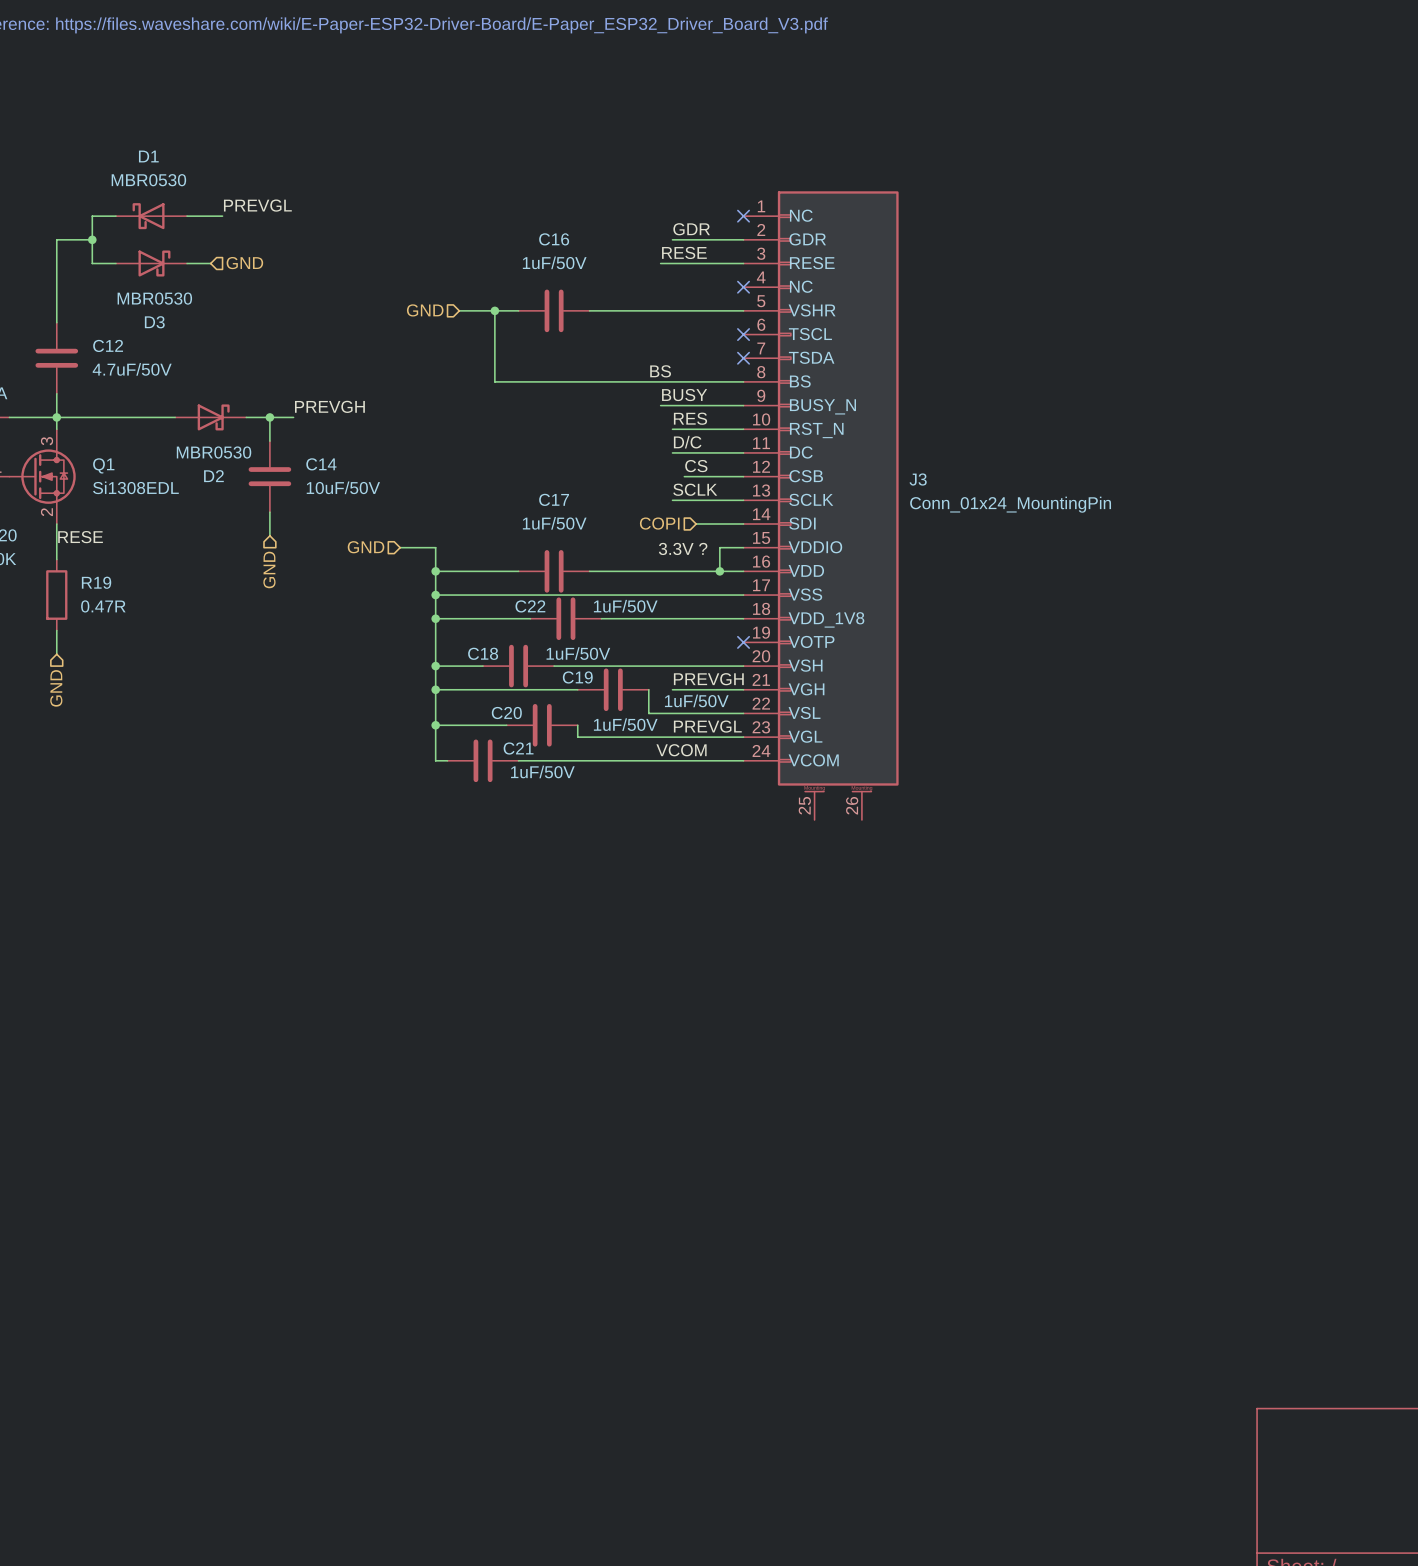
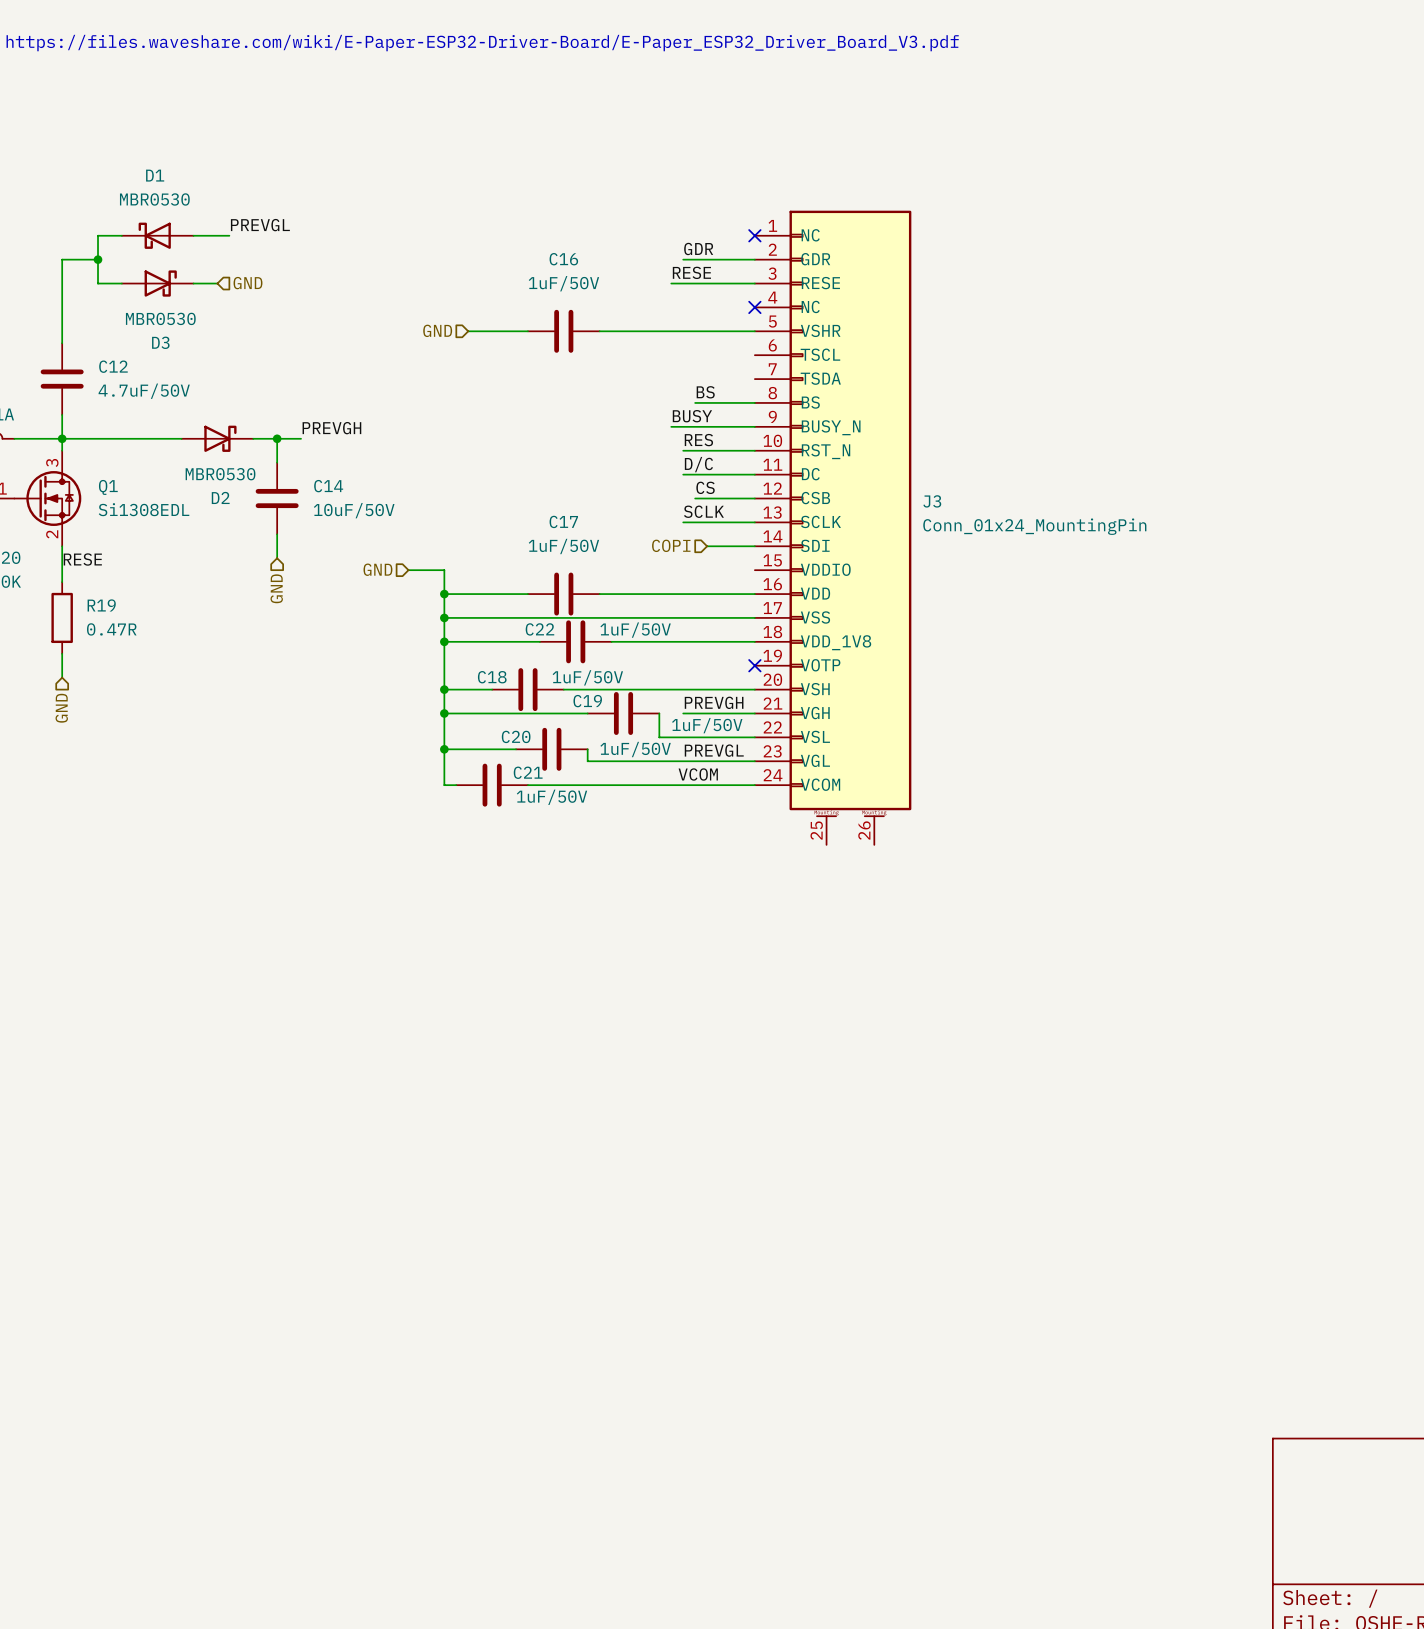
wire: (494, 310) (494, 381) (684, 381) -> none
junction: (494, 310) -> none
no-connect mark: (743, 334) -> none
no-connect mark: (743, 358) -> none
label position: BS (660, 371) -> BS (705, 392)
wire: (743, 547) (719, 547) (719, 571) -> none
label: 3.3V ? (683, 548) -> none
junction: (719, 571) -> none

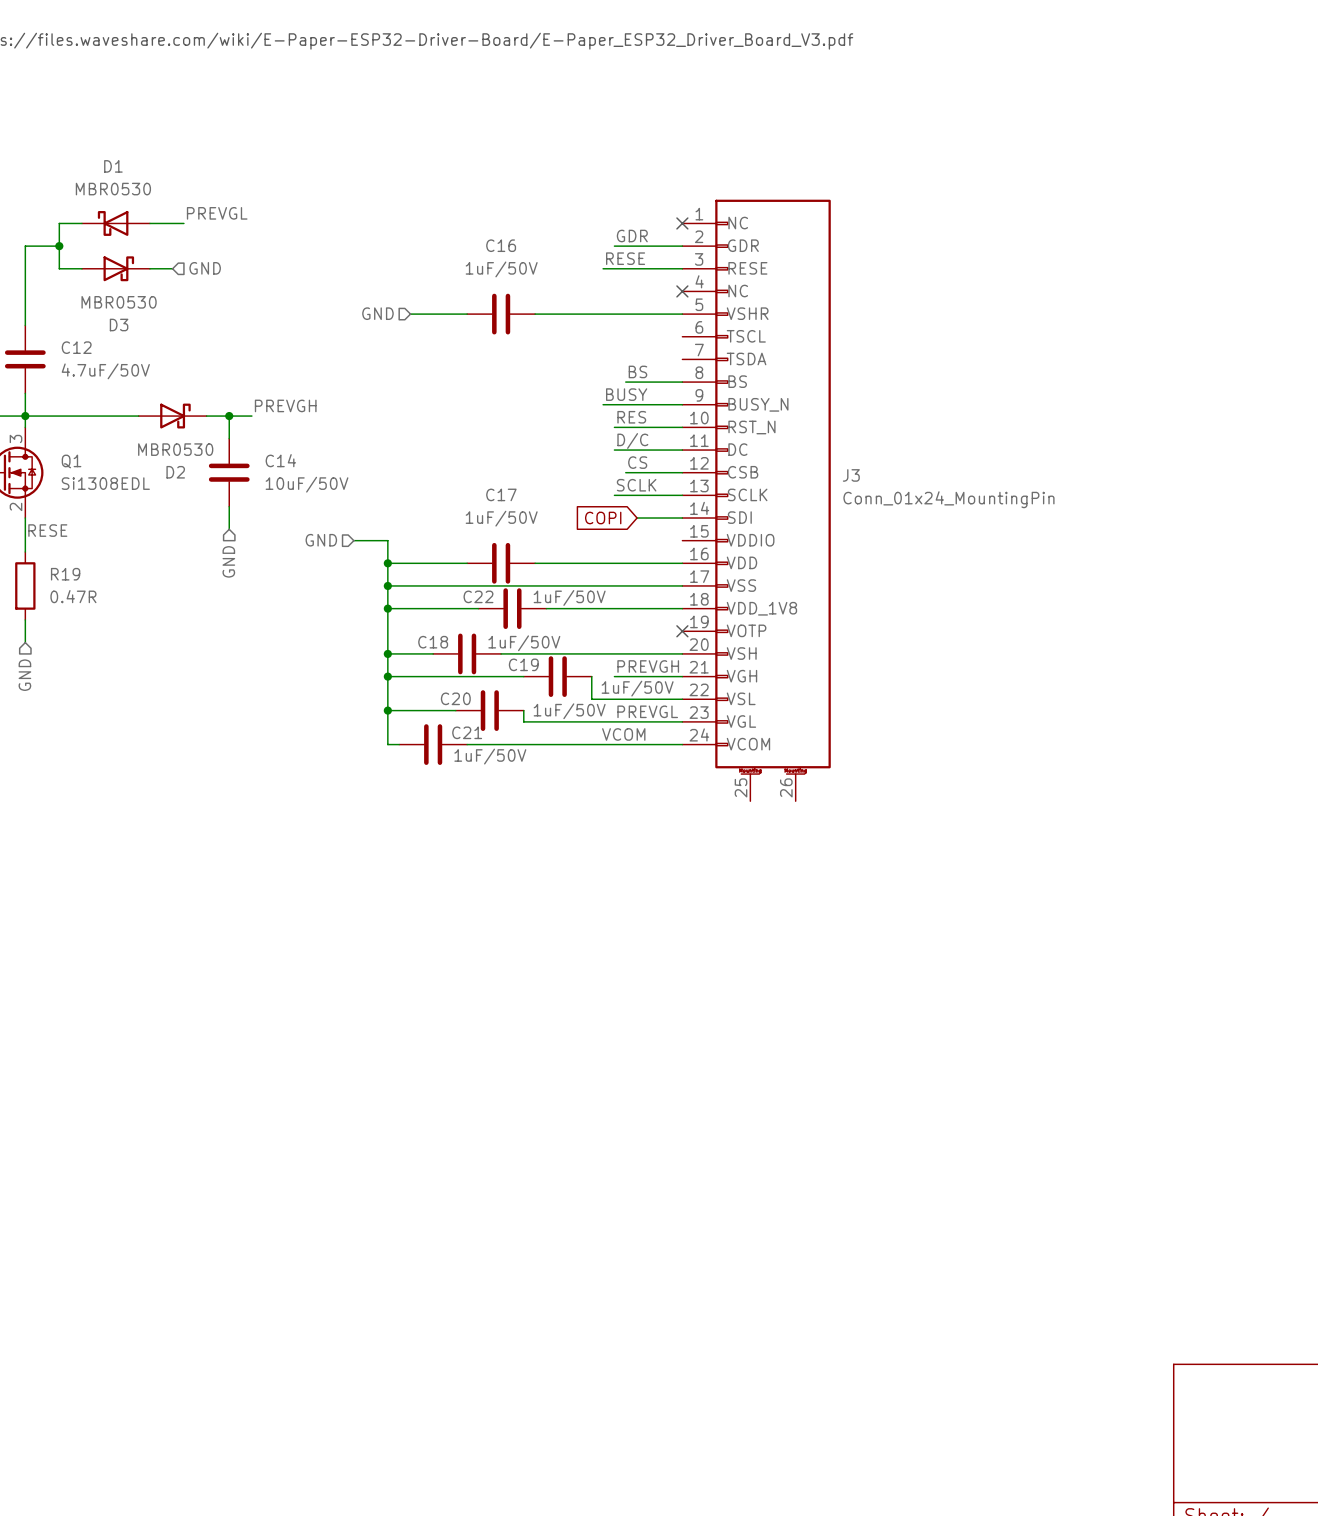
hierarchical label: COPI (671, 545) -> none
global label: none -> COPI (603, 518)

